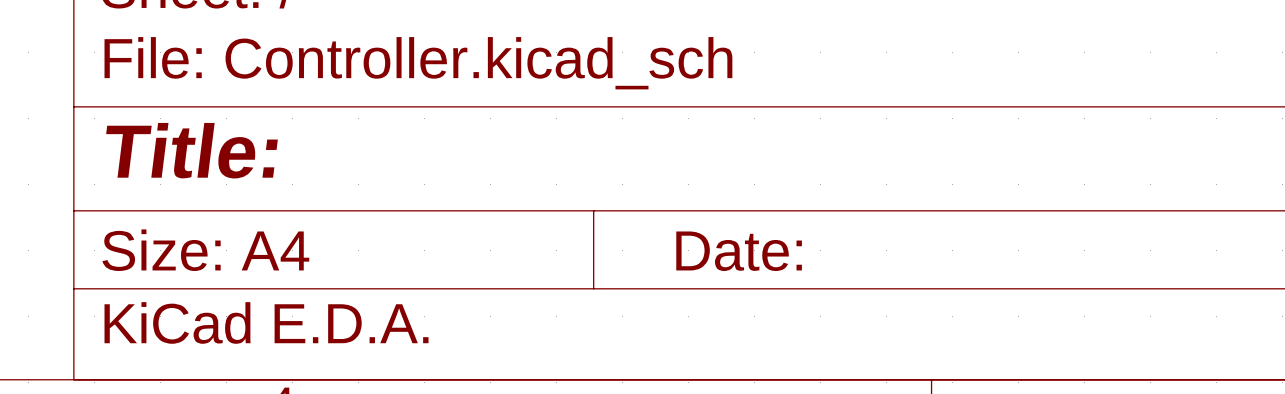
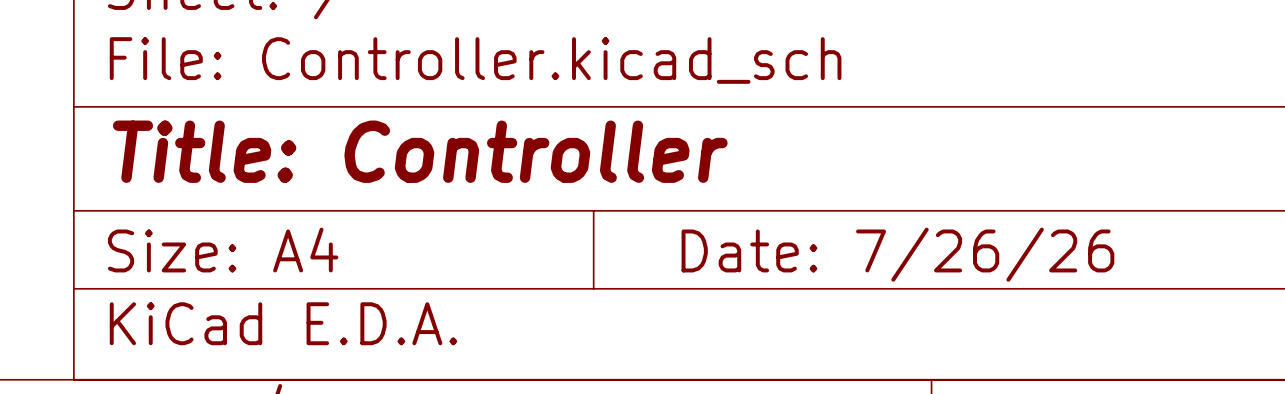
title block: Title: (192, 150) -> Title: Controller (420, 151)
title block: Date: (739, 251) -> Date: 7/26/26 (897, 254)

